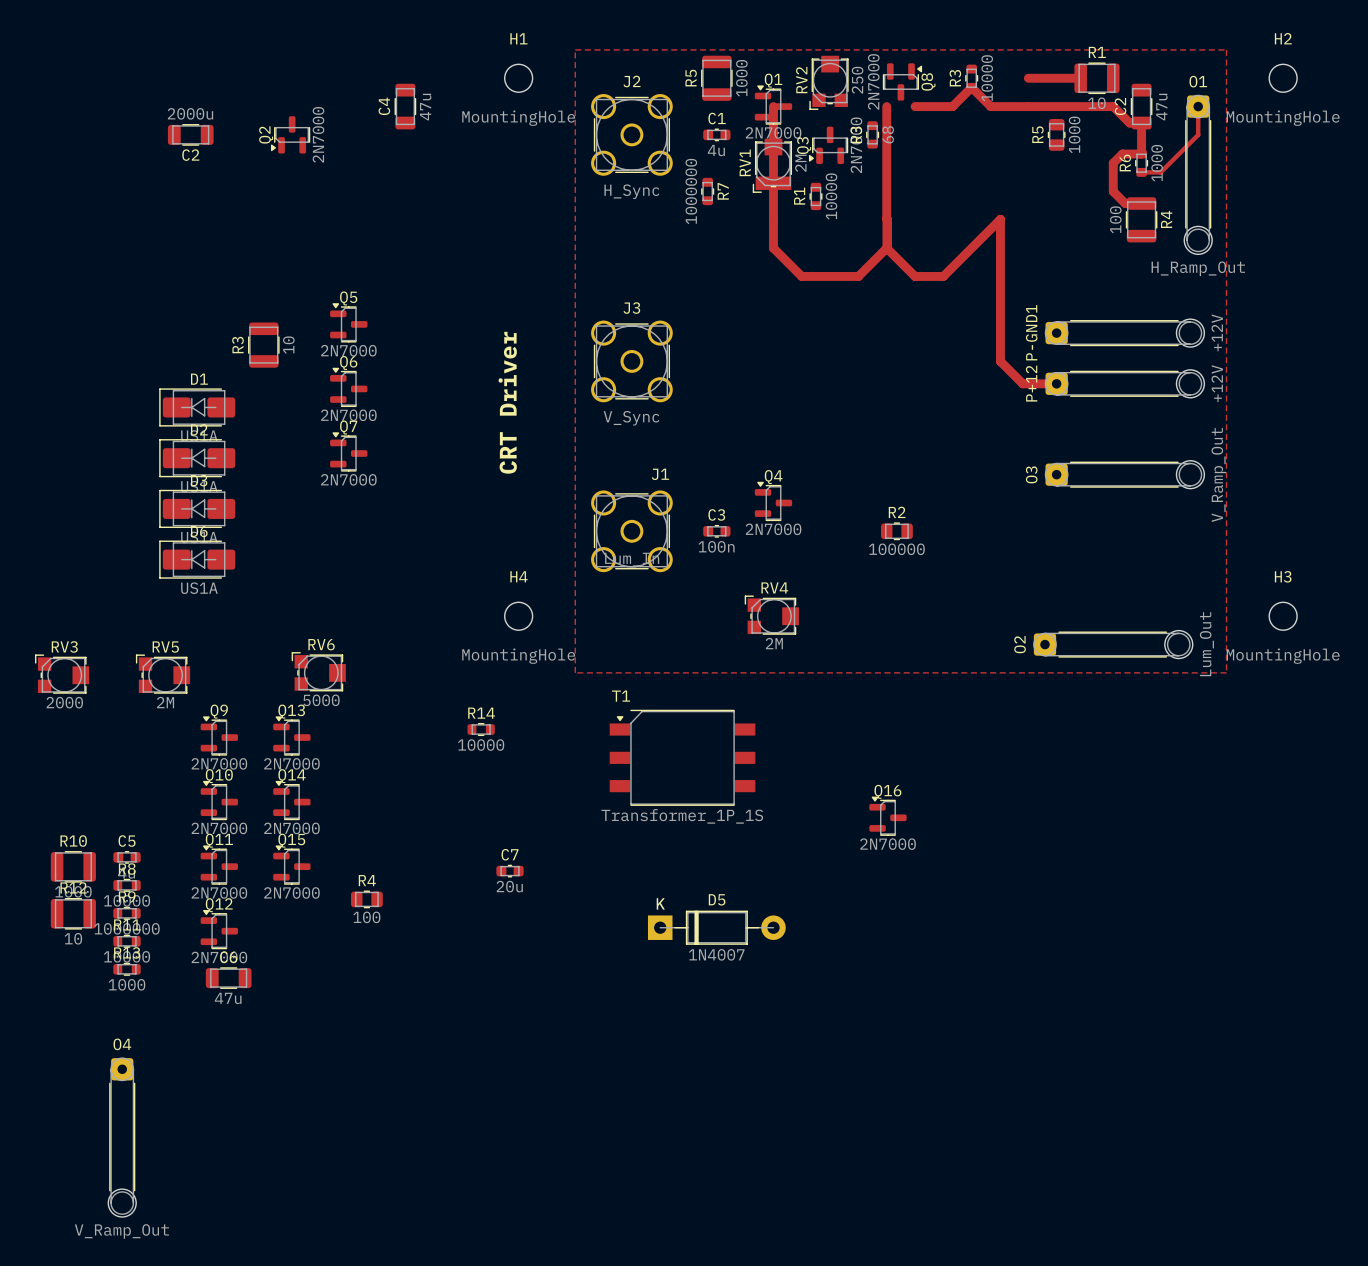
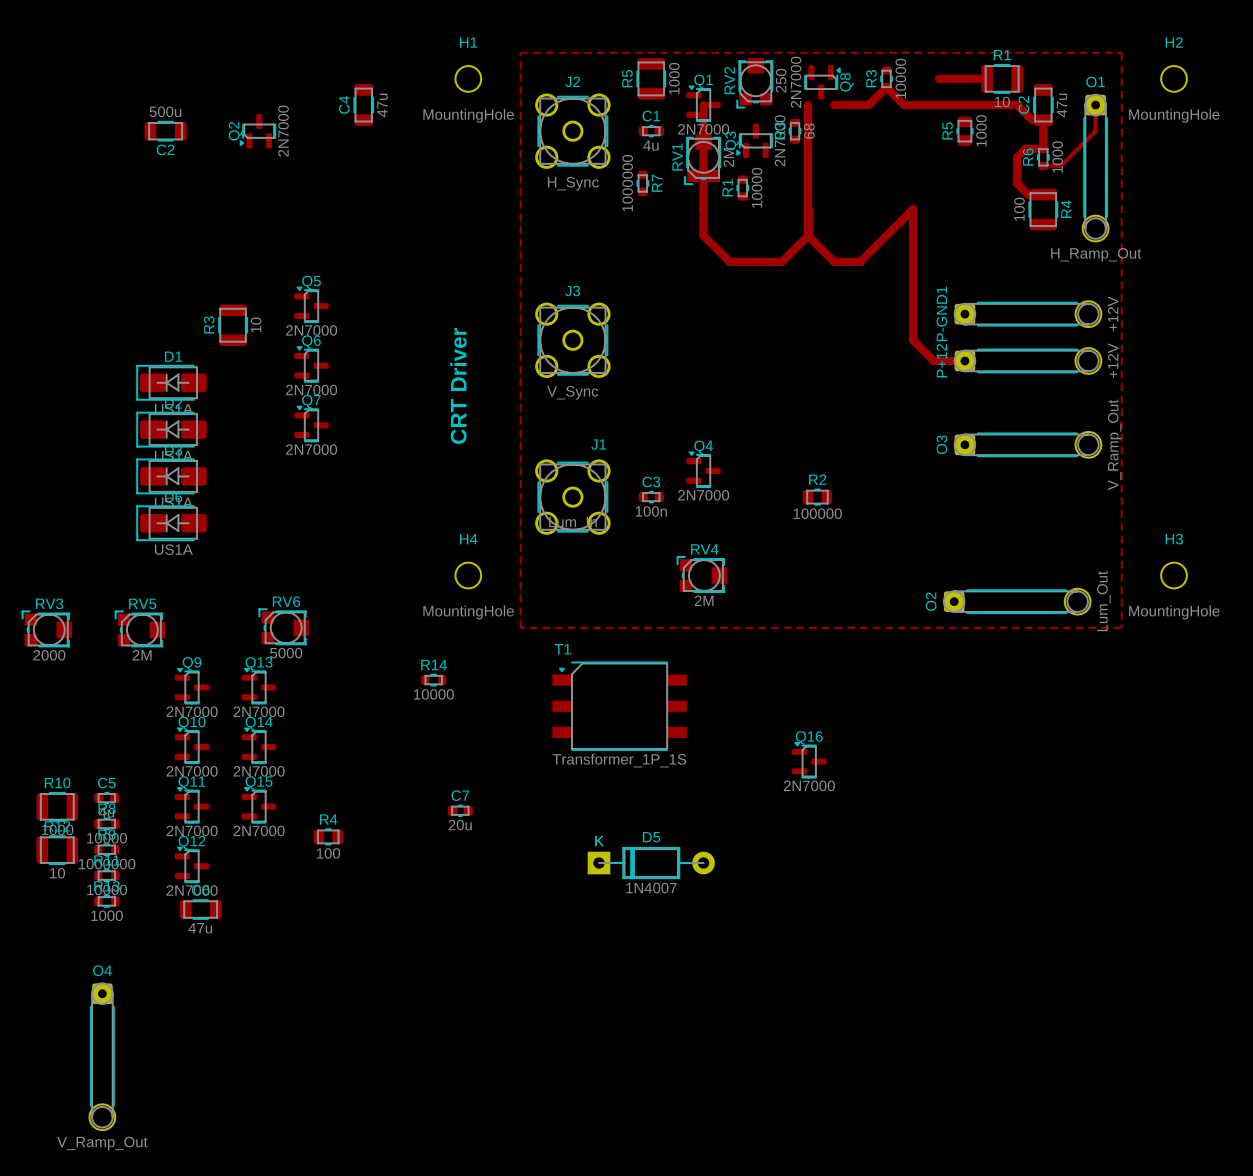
C2 value: 2000u (190, 113) -> 500u (165, 111)

